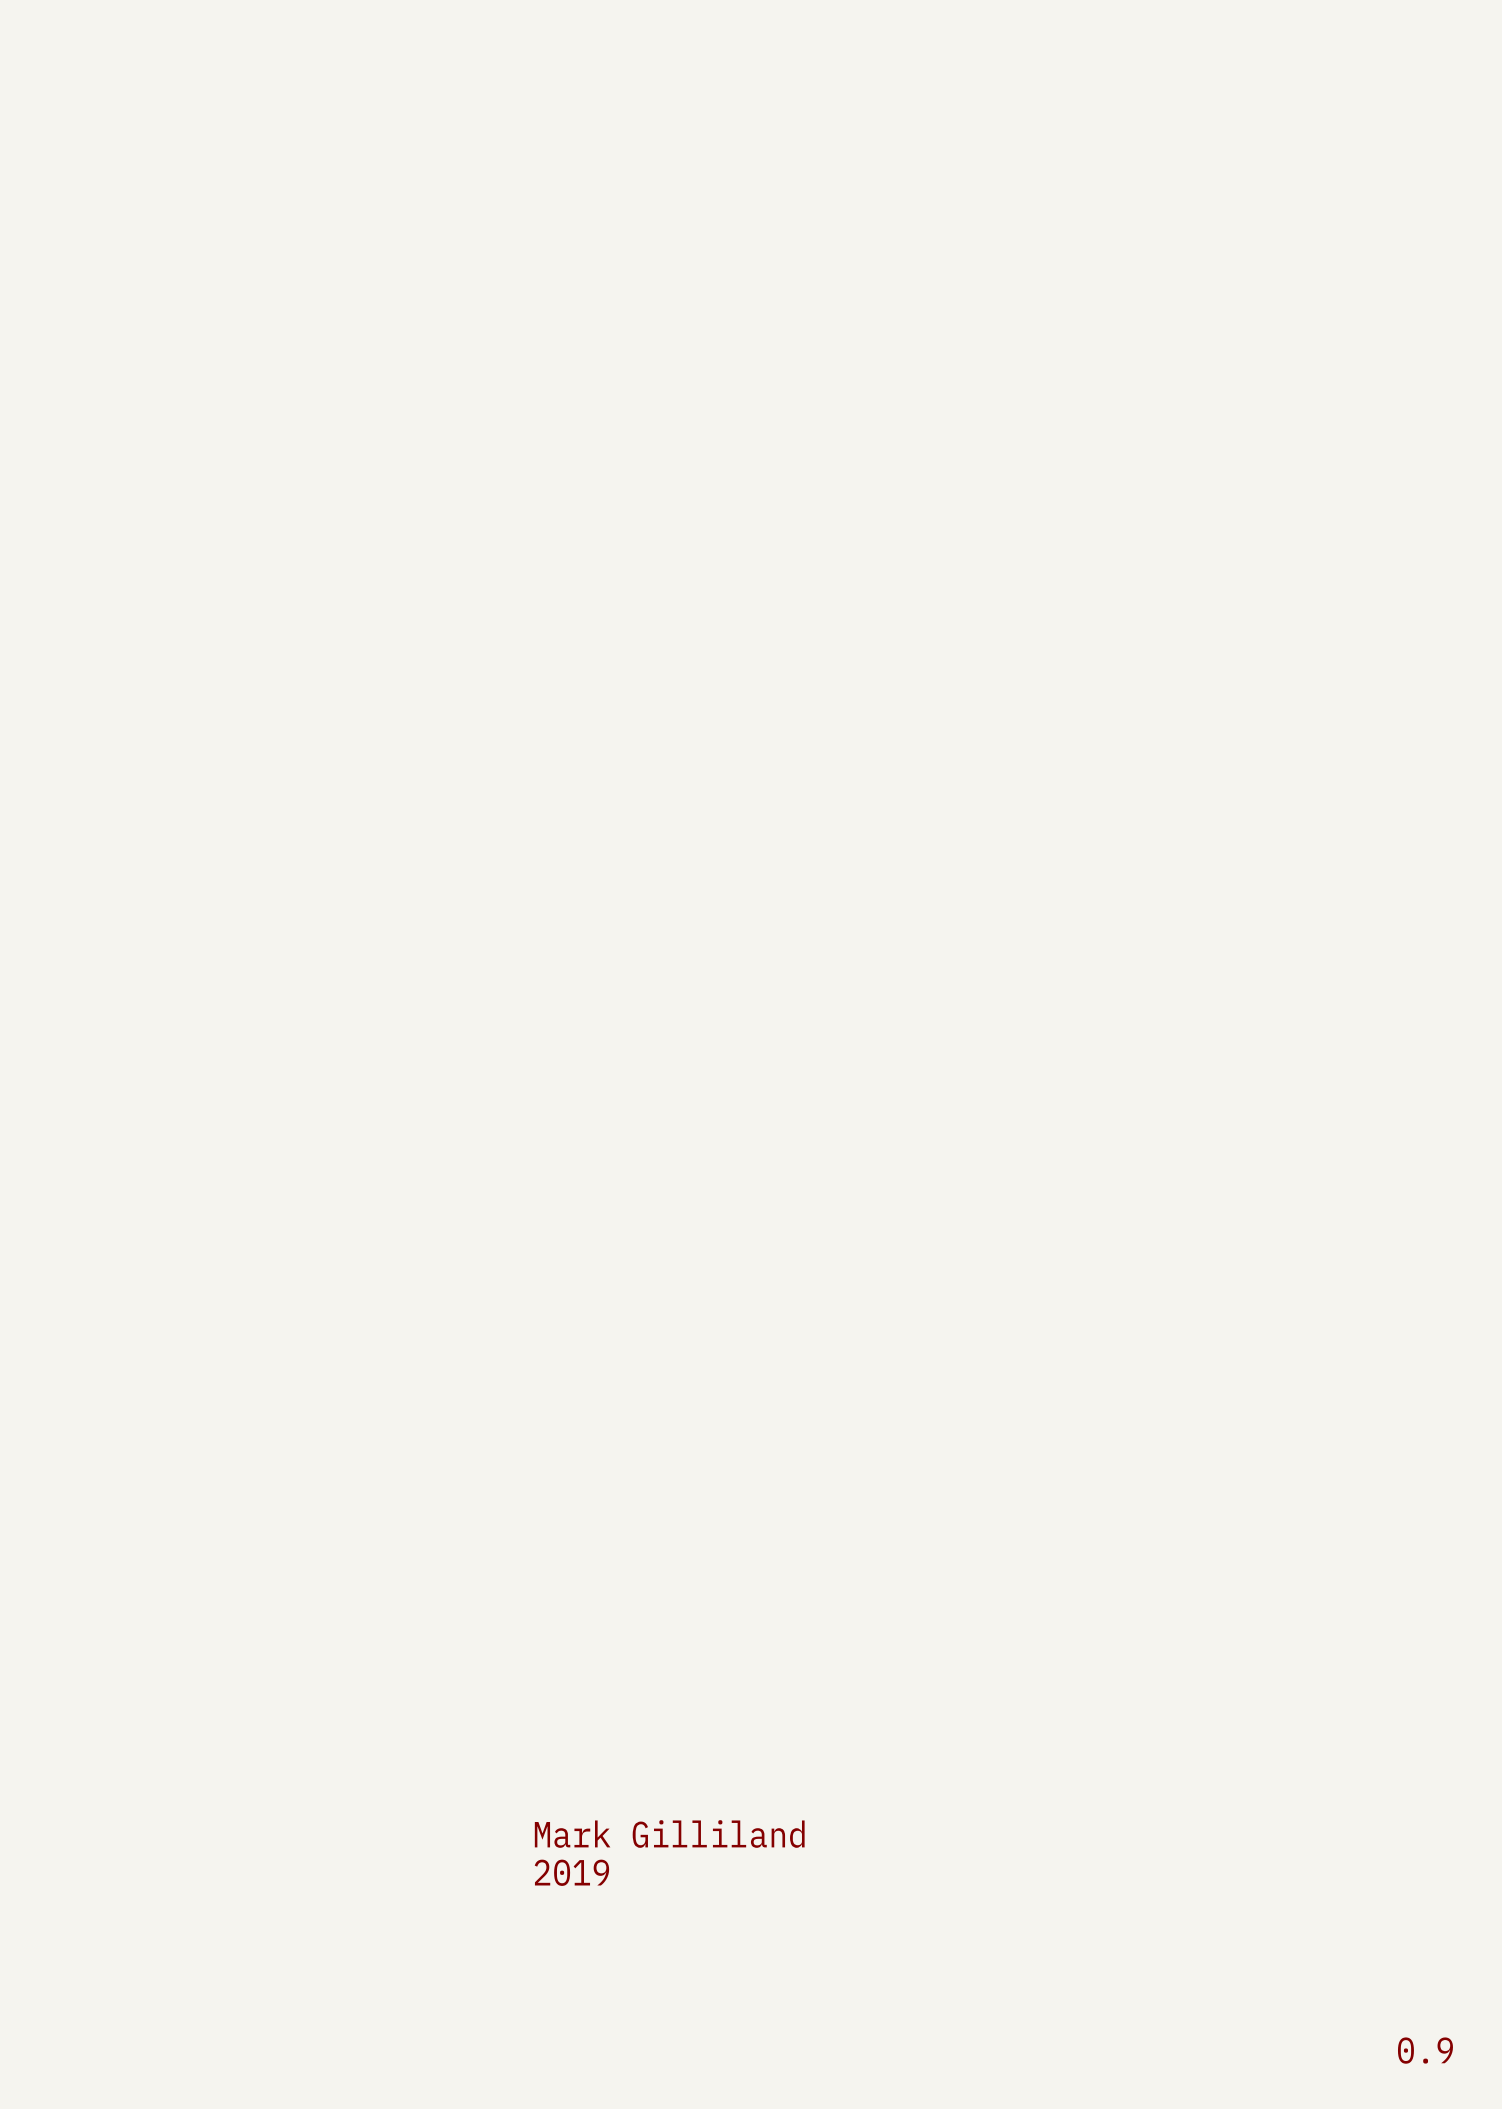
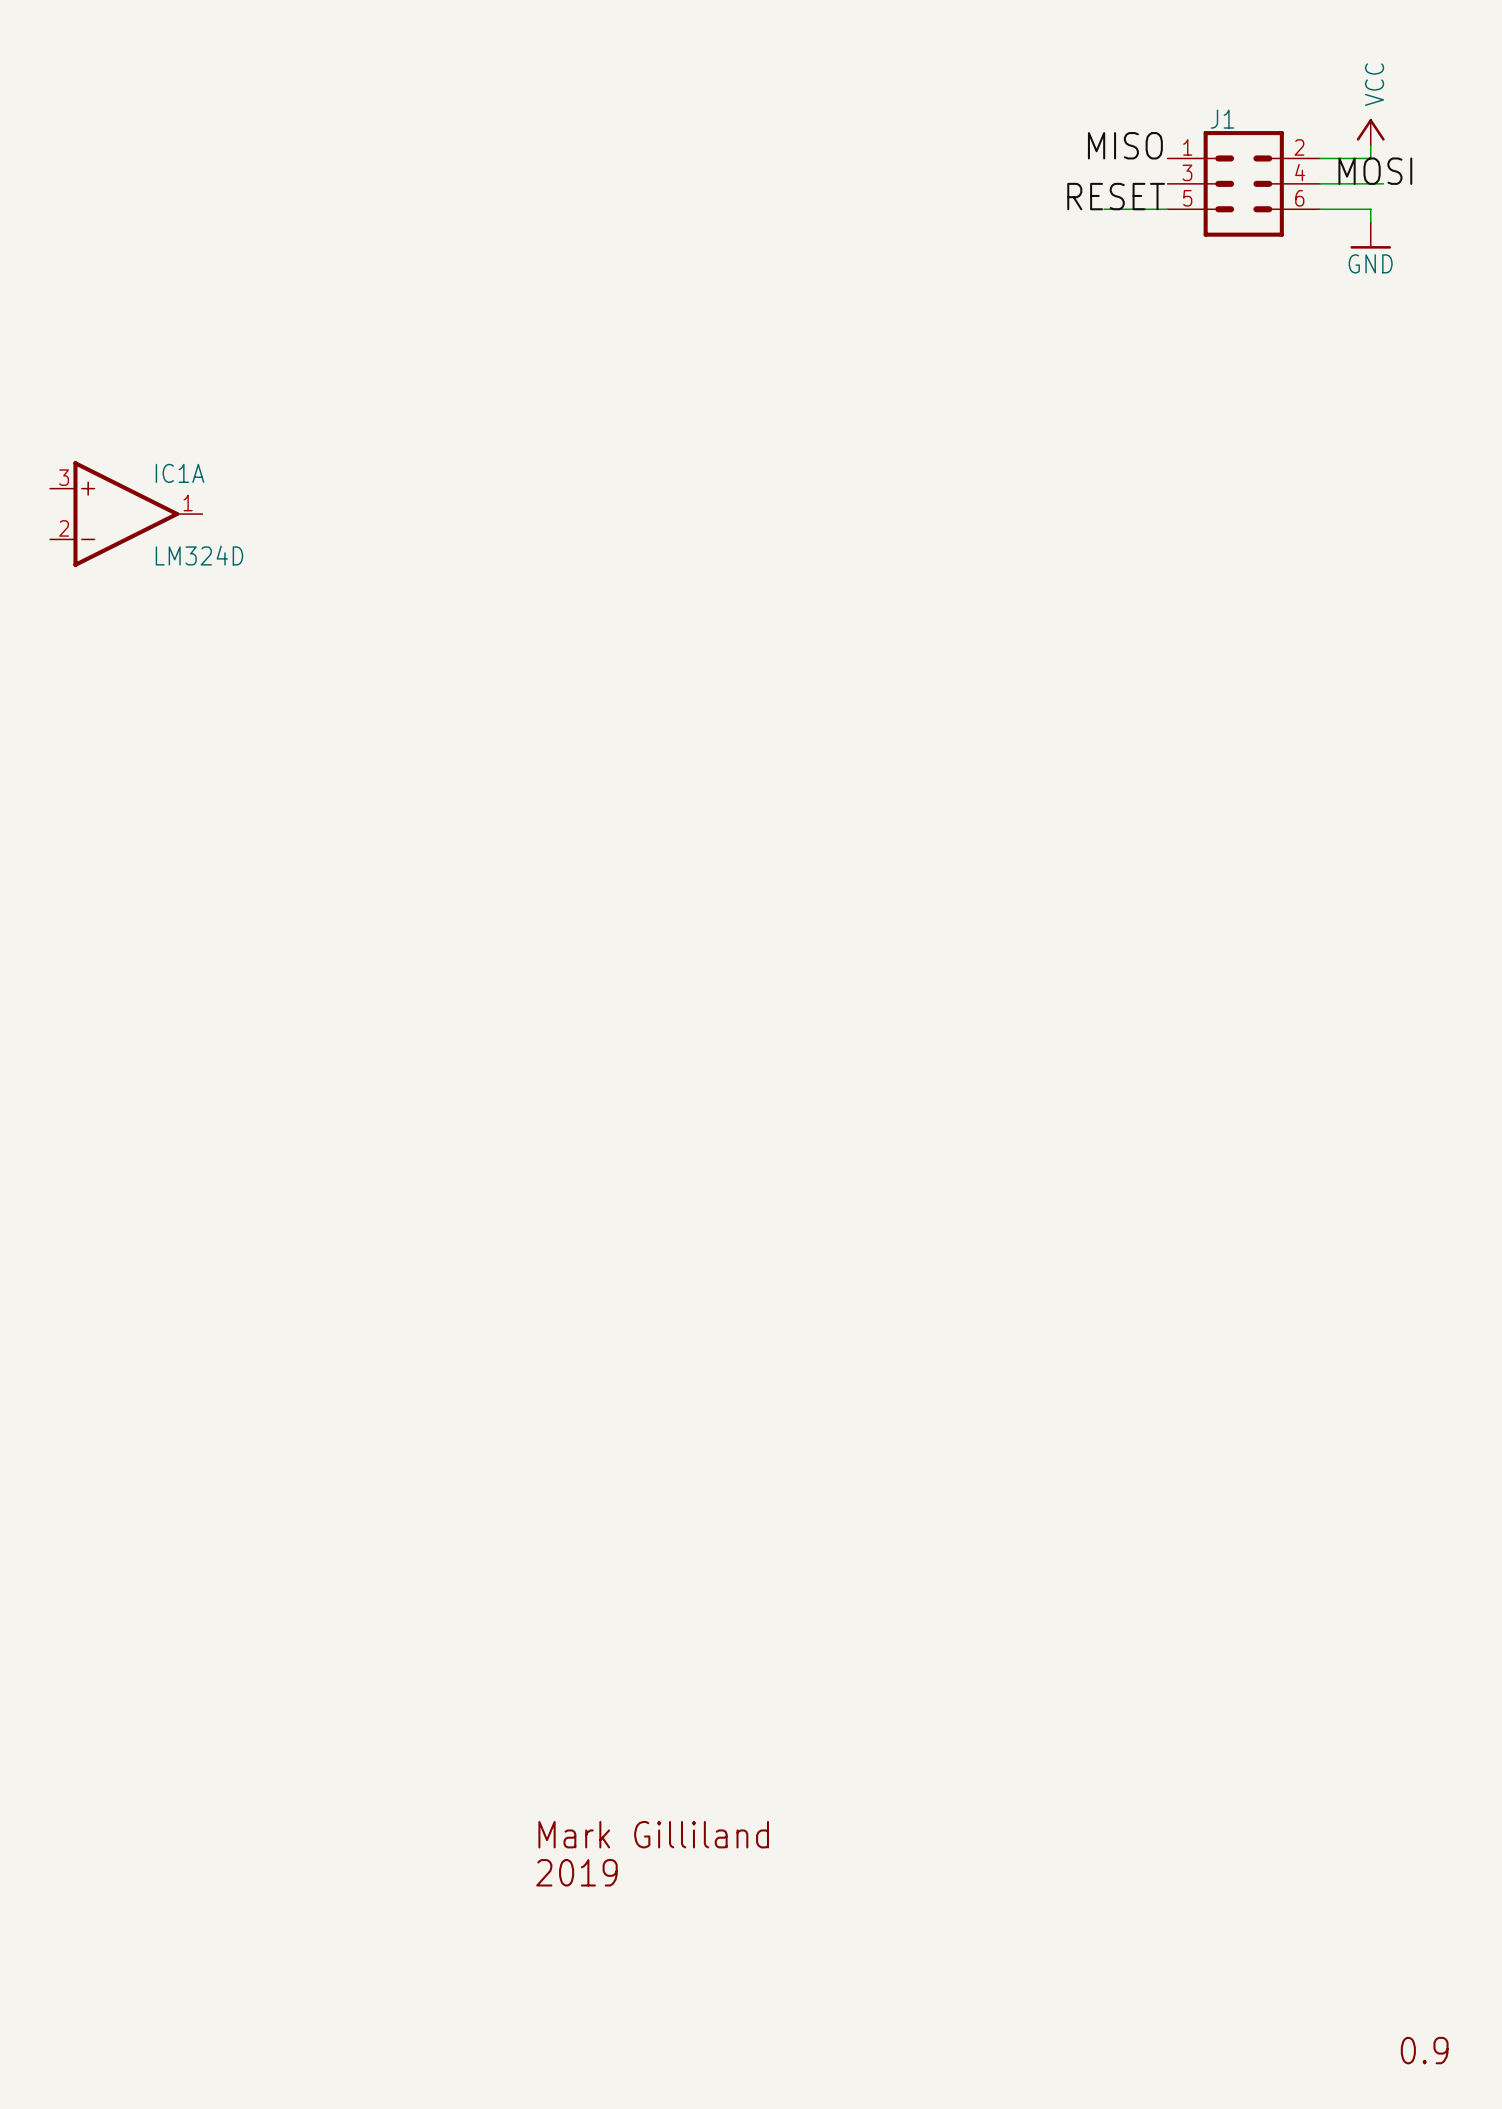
power symbol: none -> VCC (1370, 132)
label: none -> MISO (1125, 145)
wire: none -> (1370, 145) (1370, 158) (1319, 158)
label: none -> MOSI (1375, 171)
J1: none -> (1243, 183)
wire: none -> (1319, 183) (1383, 183)
label: none -> RESET (1116, 196)
wire: none -> (1104, 209) (1167, 209)
wire: none -> (1319, 209) (1370, 209) (1370, 221)
power symbol: none -> GND (1370, 235)
IC1A: none -> LM324D (126, 514)

